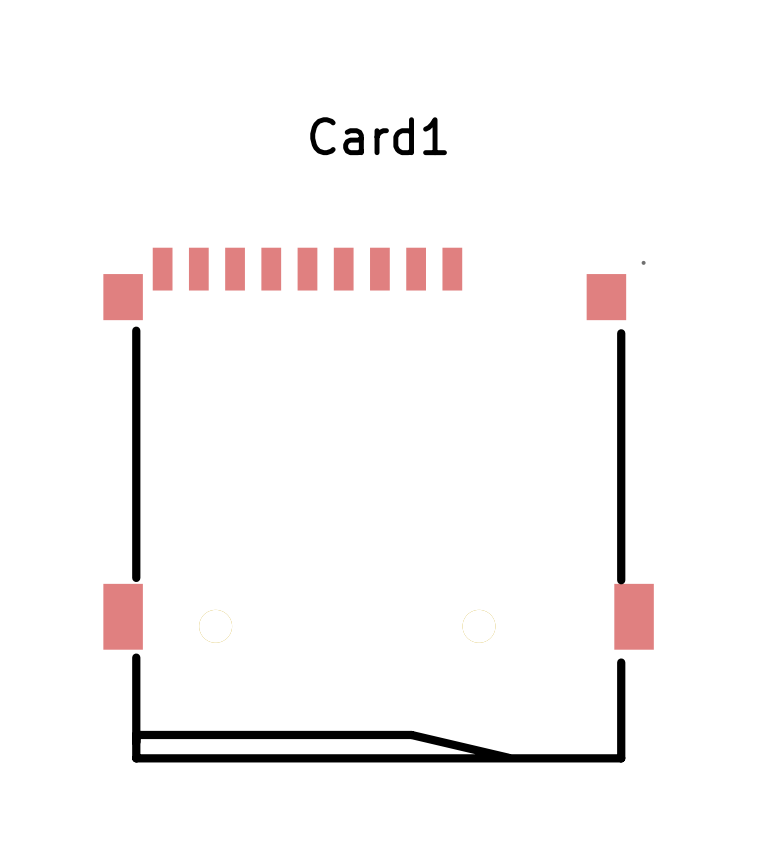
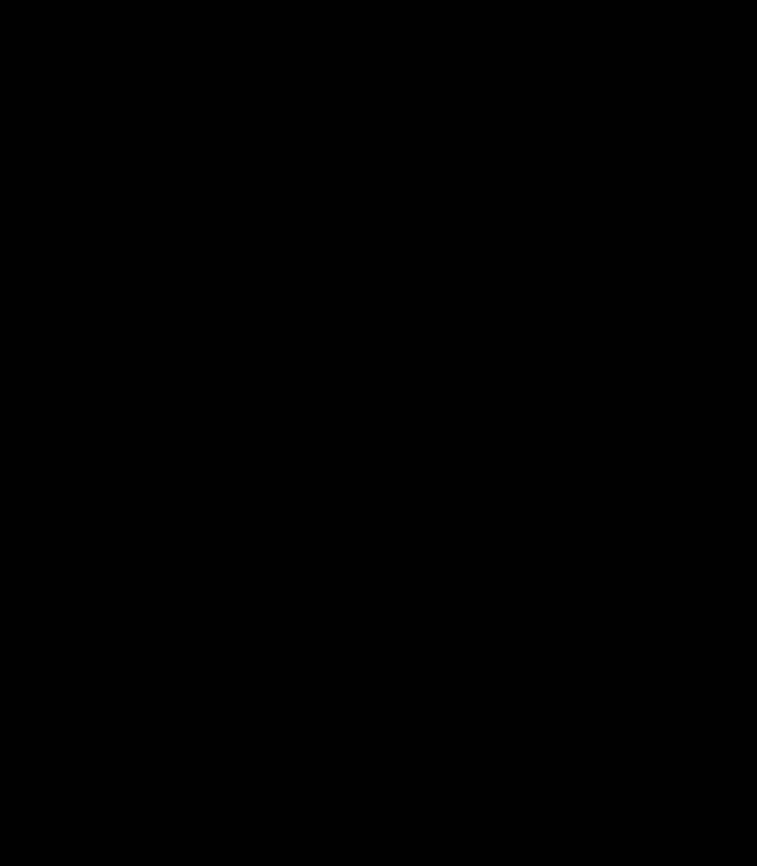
Card1: (378, 505) -> none

